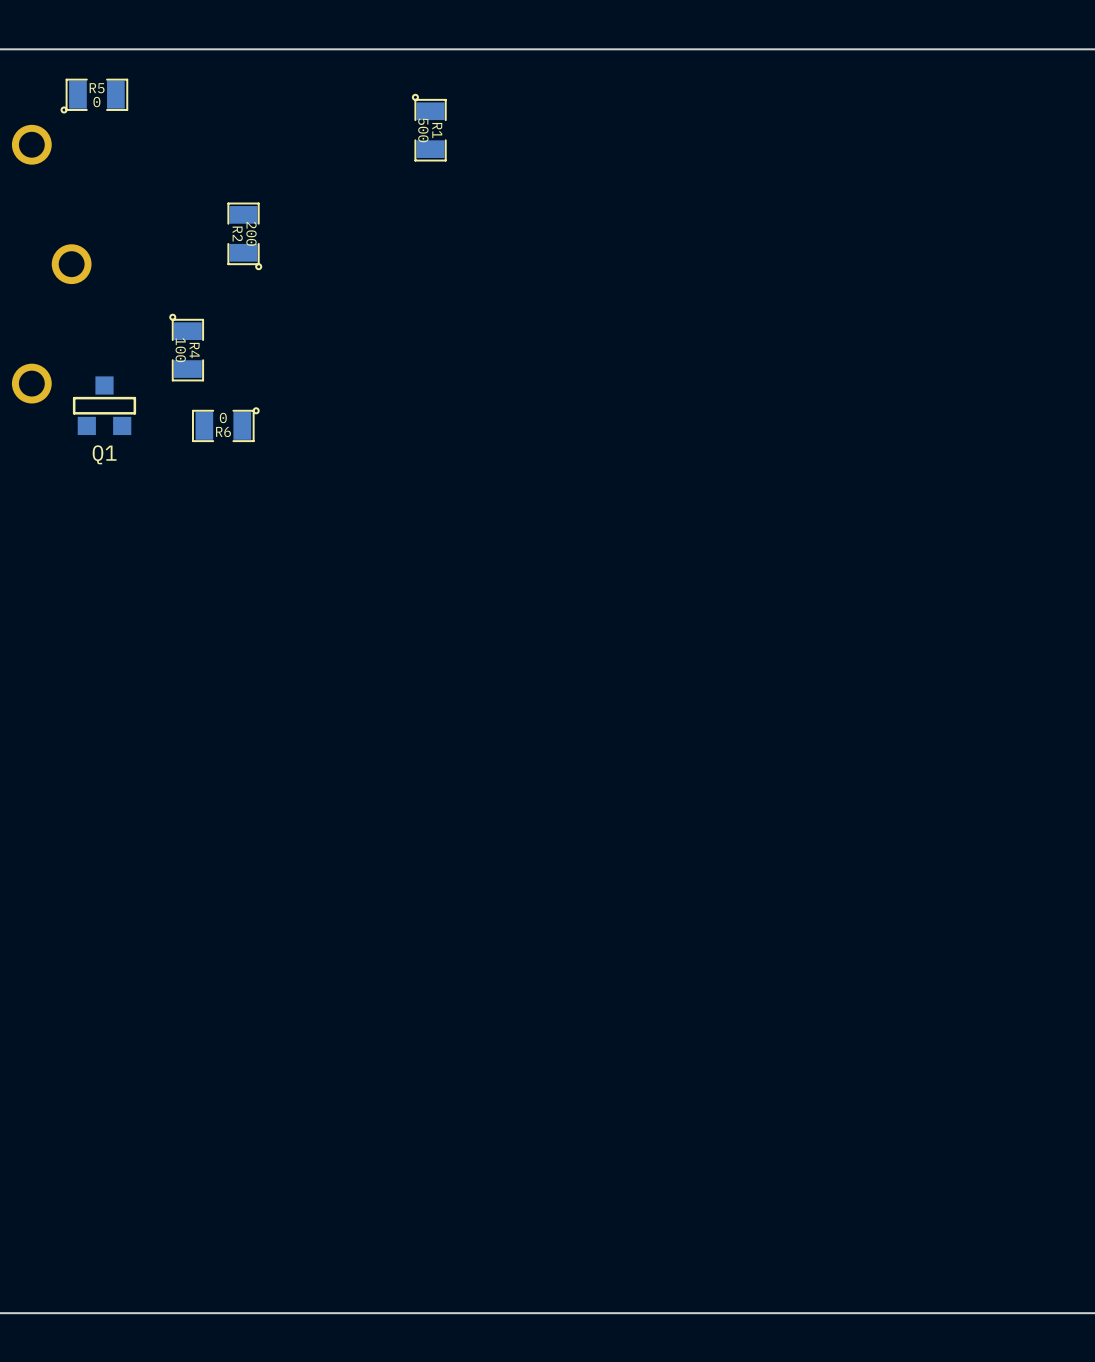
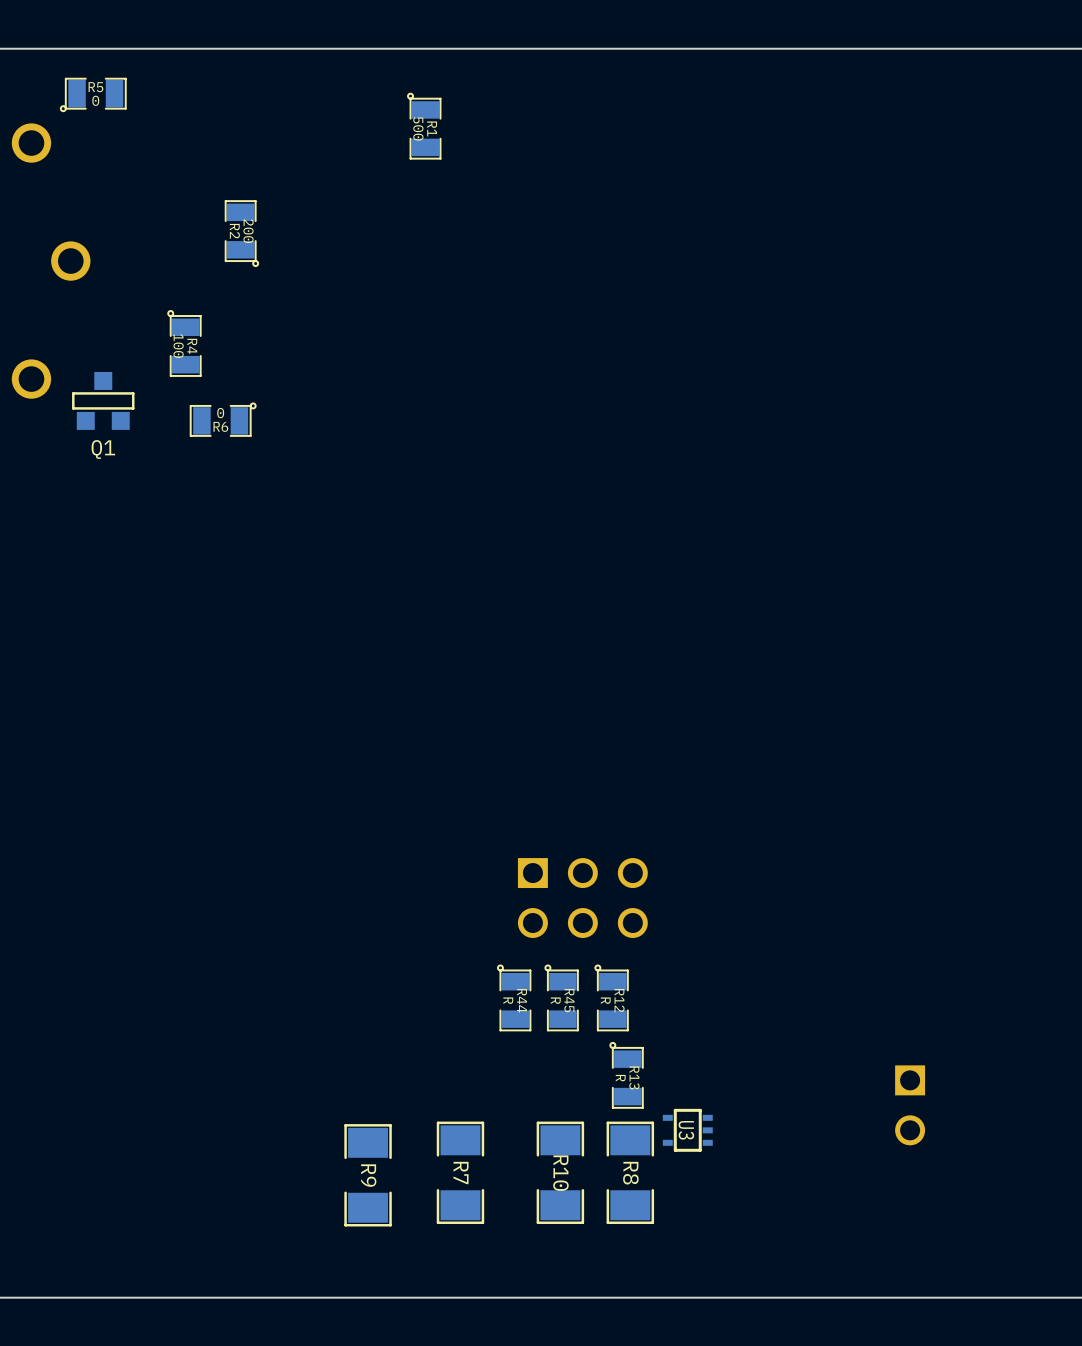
part: none -> (582, 898)
R44: none -> R (514, 997)
R45: none -> R (561, 997)
R12: none -> R (611, 997)
R13: none -> R (626, 1075)
part: none -> (910, 1105)
U3: none -> (687, 1130)
R7: none -> (460, 1172)
R10: none -> (560, 1172)
R8: none -> (630, 1172)
R9: none -> (368, 1175)

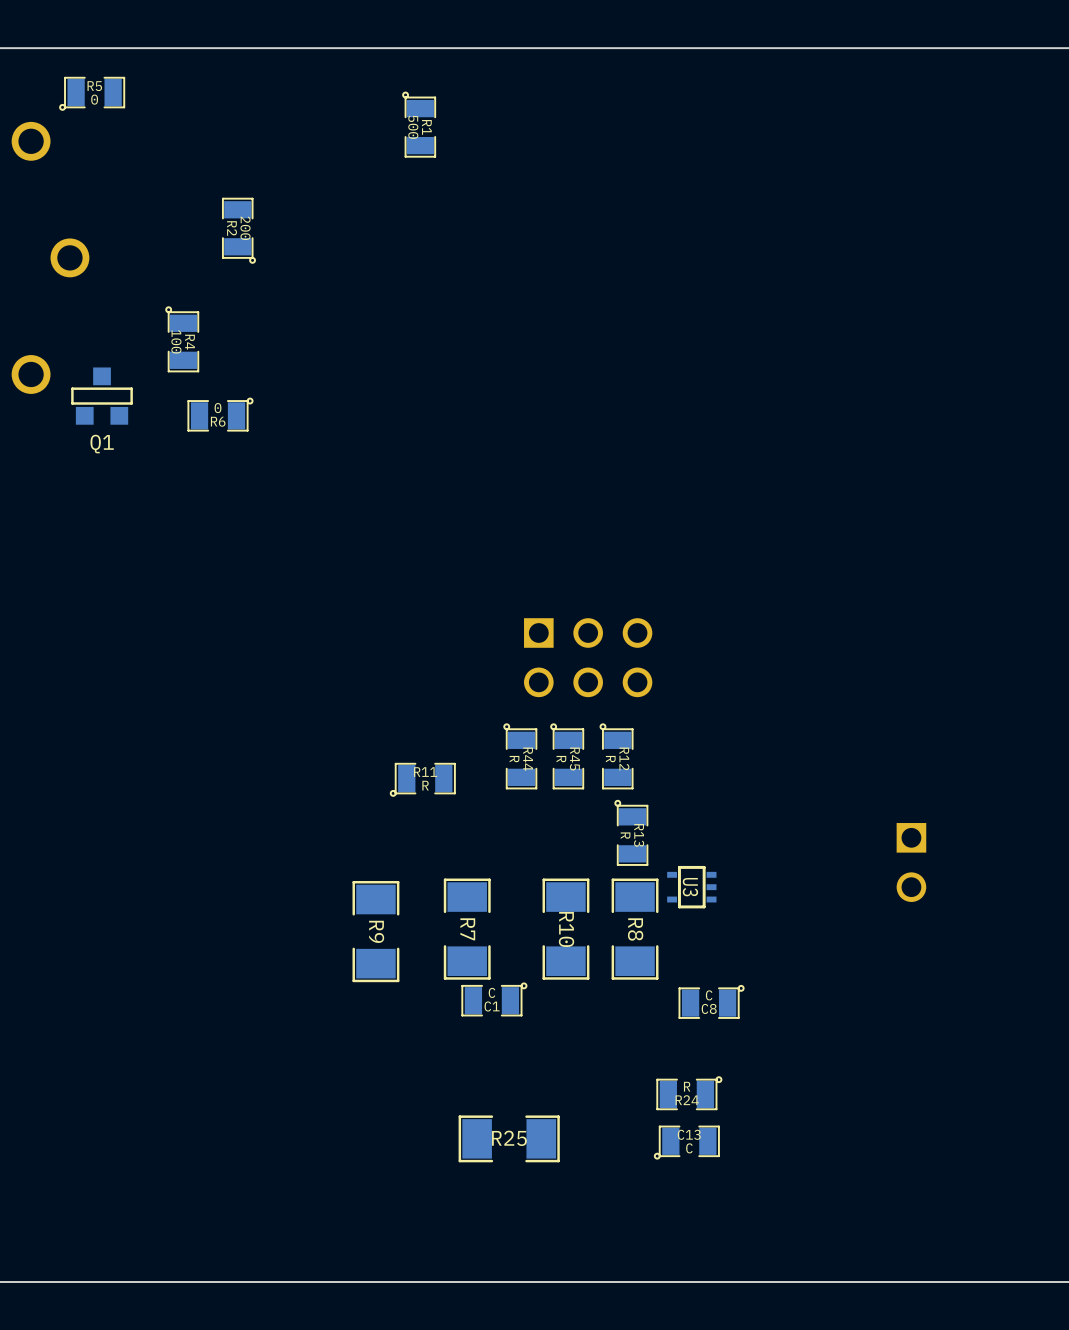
R11: none -> R (422, 779)
part position: (582, 898) -> (588, 657)
R44 position: (514, 997) -> (520, 756)
R45 position: (561, 997) -> (567, 756)
R12 position: (611, 997) -> (616, 756)
C1: none -> C (494, 999)
C8: none -> C (711, 1001)
R13 position: (626, 1075) -> (631, 832)
part position: (910, 1105) -> (911, 862)
R24: none -> R (689, 1093)
U3 position: (687, 1130) -> (691, 887)
R25: none -> (509, 1138)
C13: none -> C (686, 1142)
R7 position: (460, 1172) -> (467, 929)
R10 position: (560, 1172) -> (565, 929)
R8 position: (630, 1172) -> (635, 929)
R9 position: (368, 1175) -> (375, 931)

